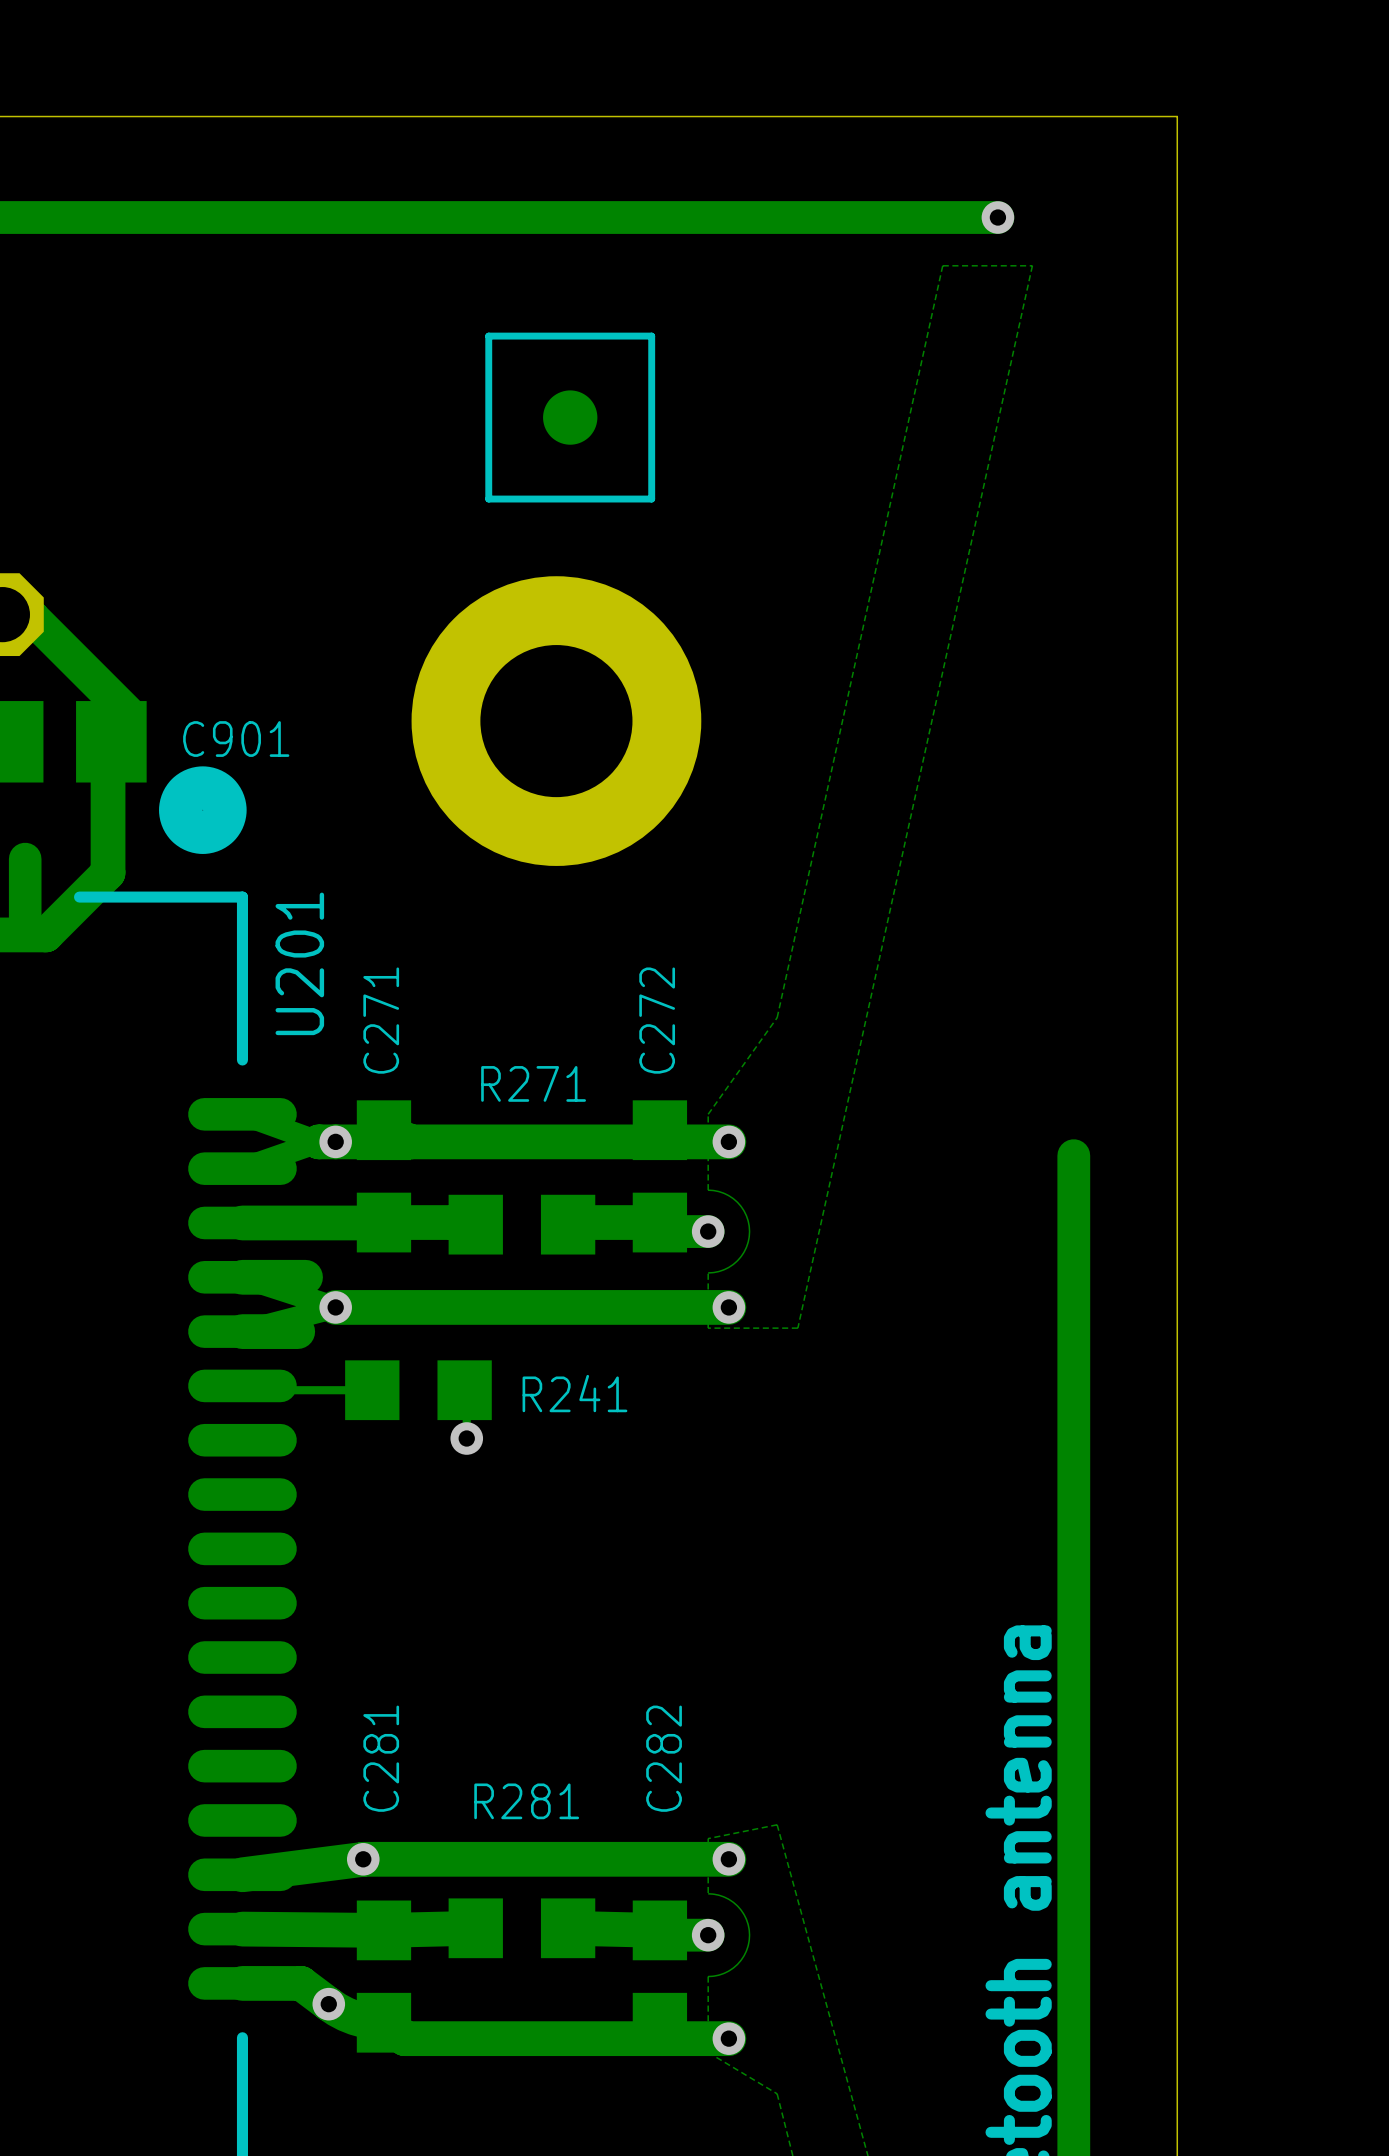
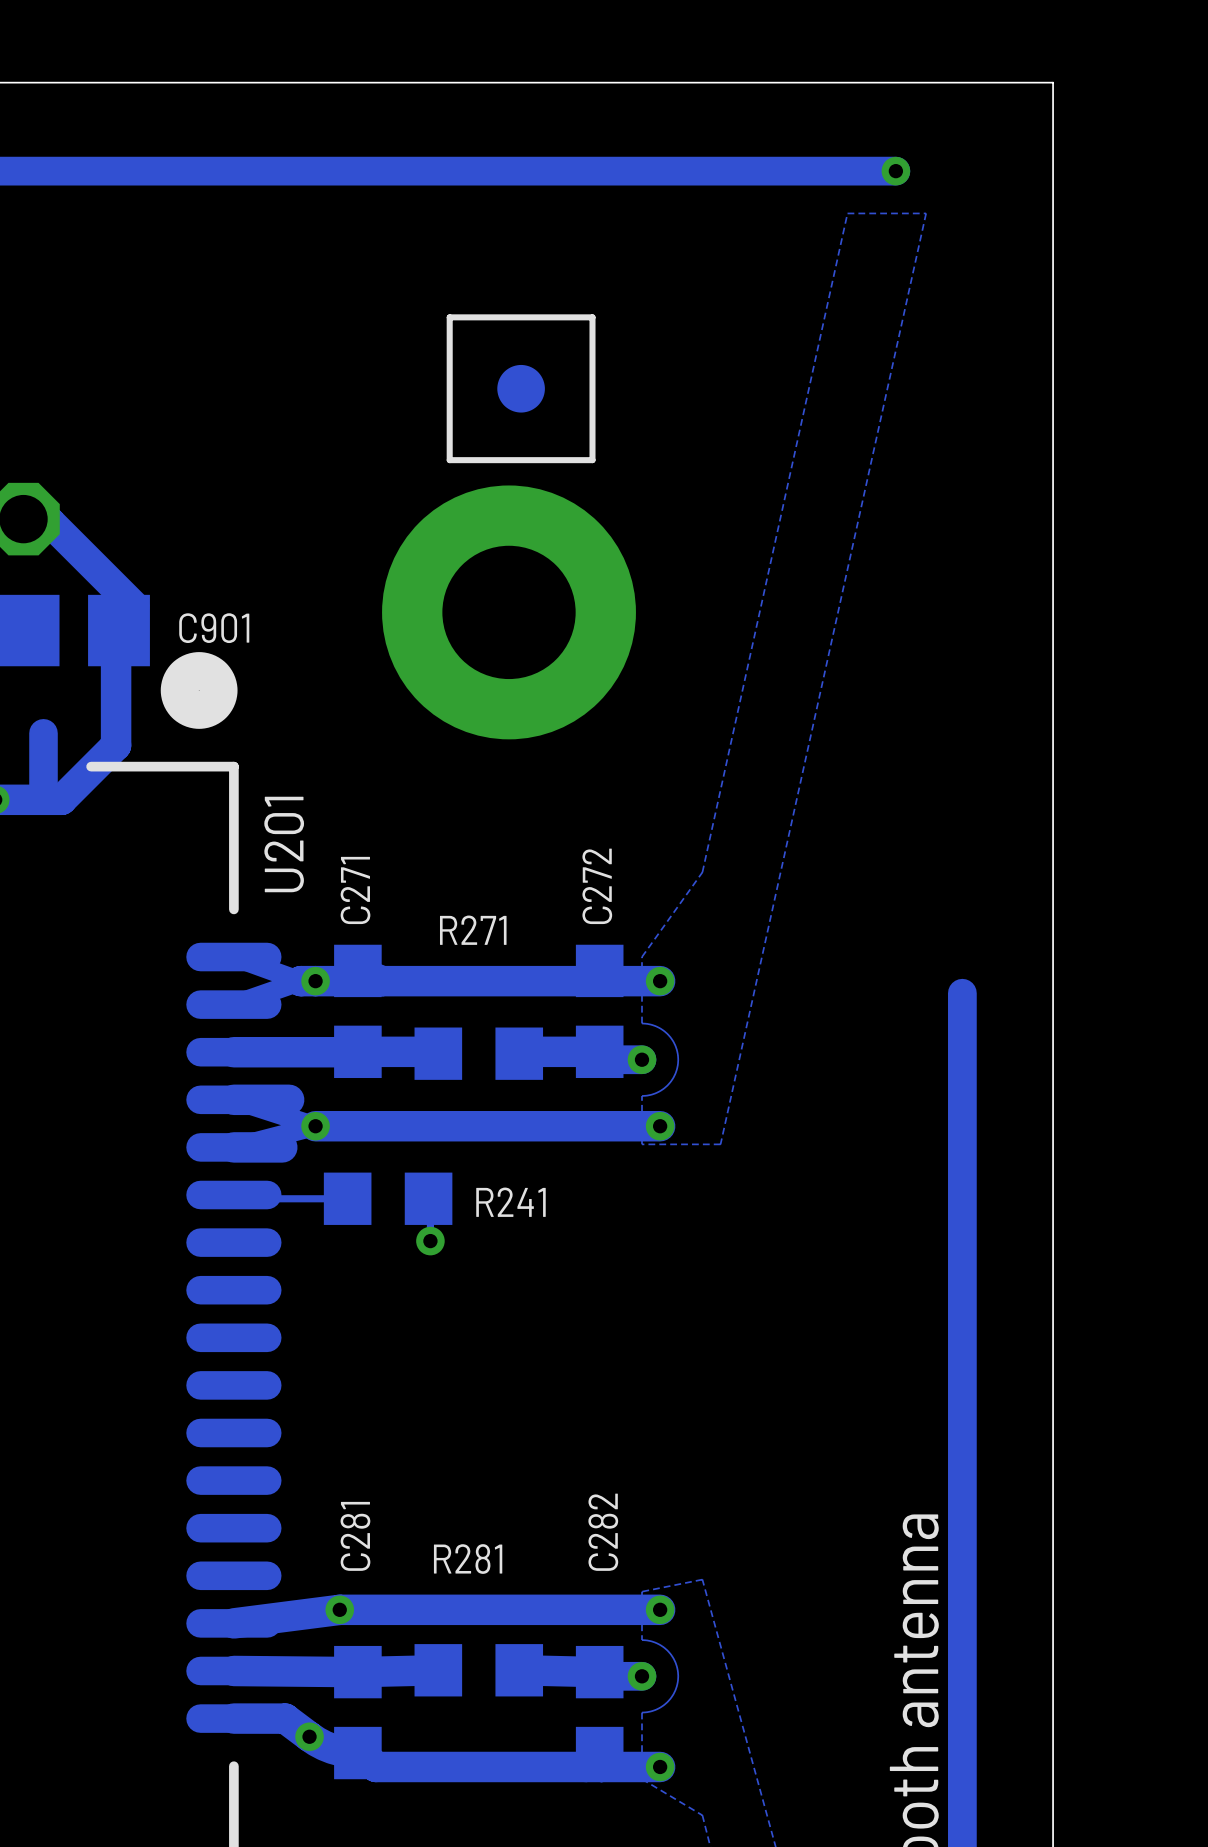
drawing position: (570, 417) -> (521, 388)

